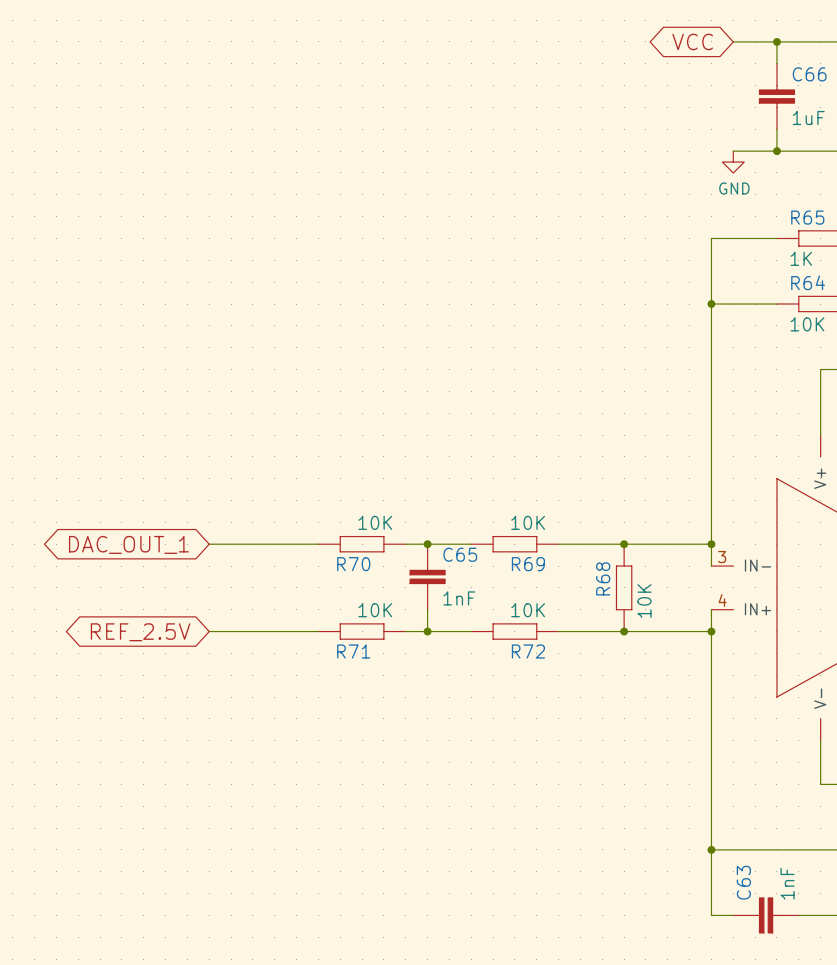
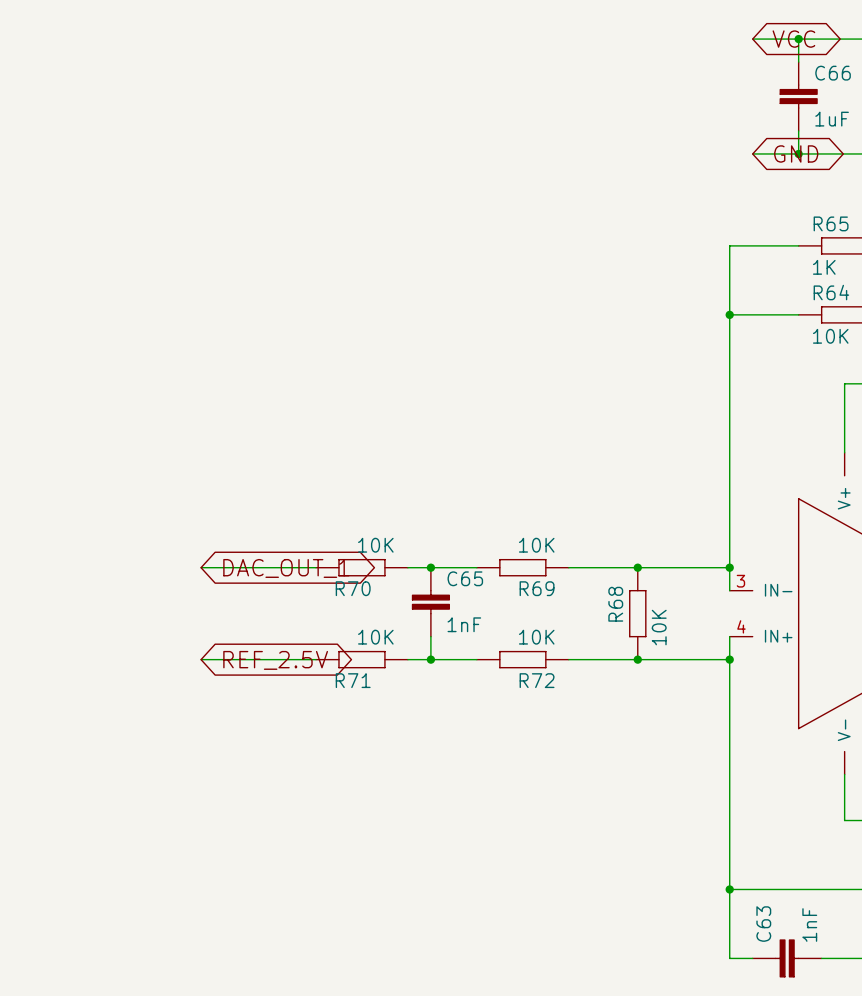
global label rotation: 0° (692, 41) -> 180° (793, 39)
global label: none -> GND (796, 153)
power symbol: GND (733, 162) -> none
global label rotation: 0° (128, 544) -> 180° (286, 568)
global label rotation: 0° (140, 632) -> 180° (275, 660)

